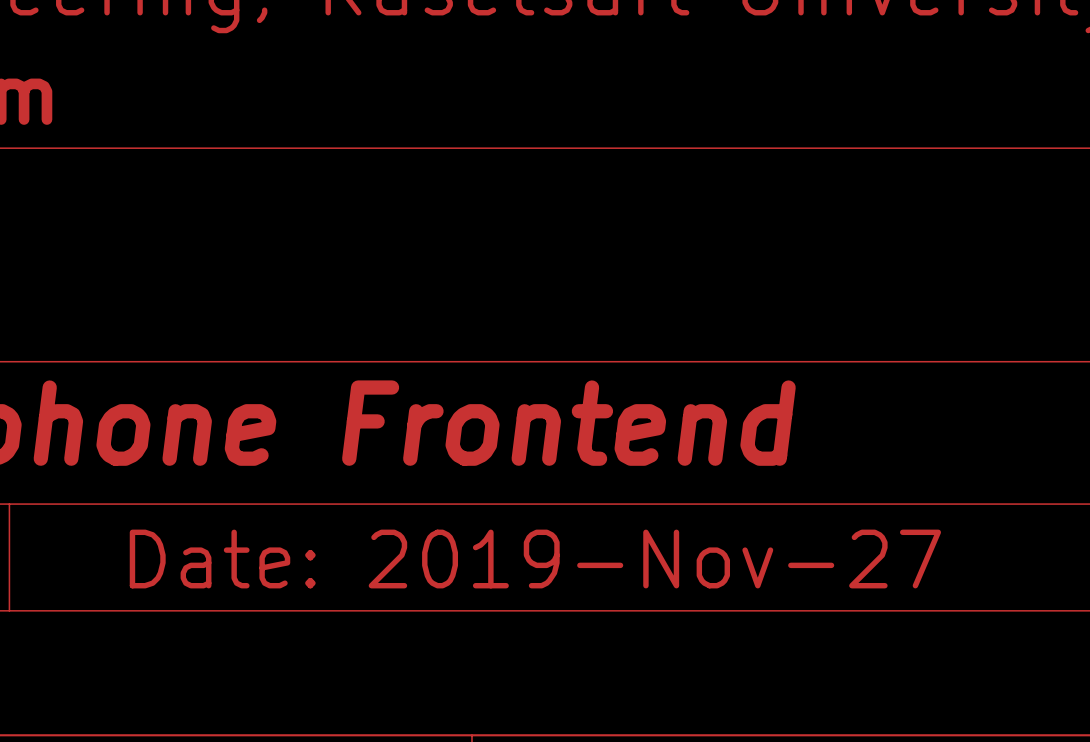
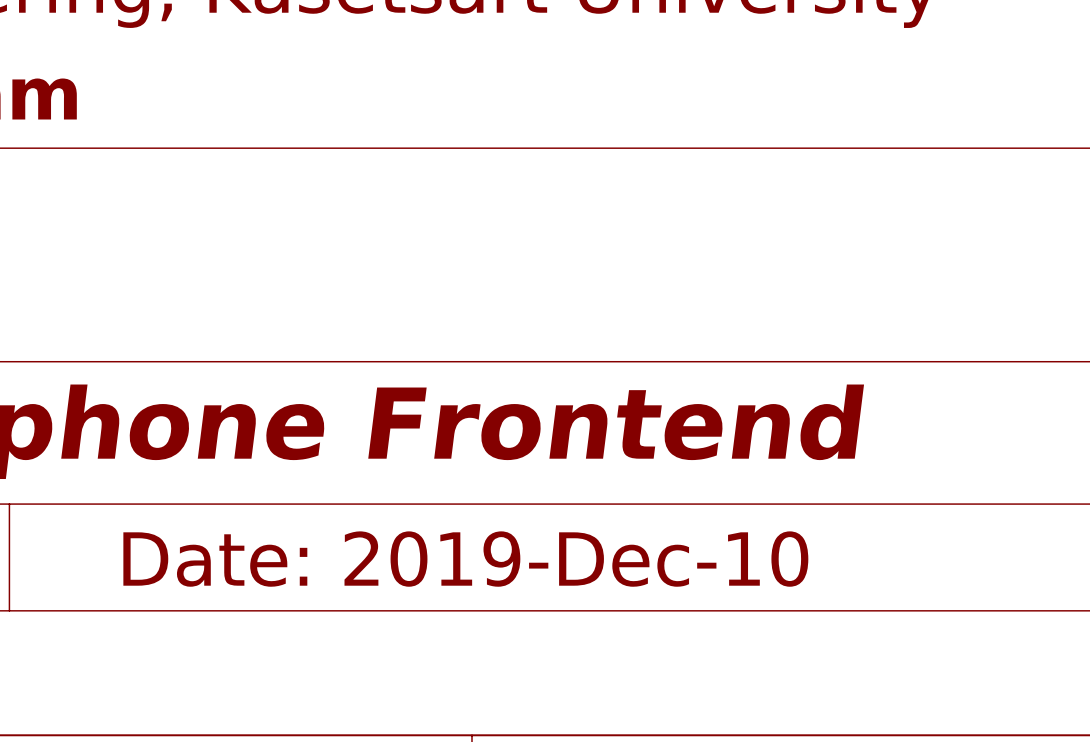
title block: Date: 2019-Nov-27 (535, 559) -> Date: 2019-Dec-10 (465, 559)

